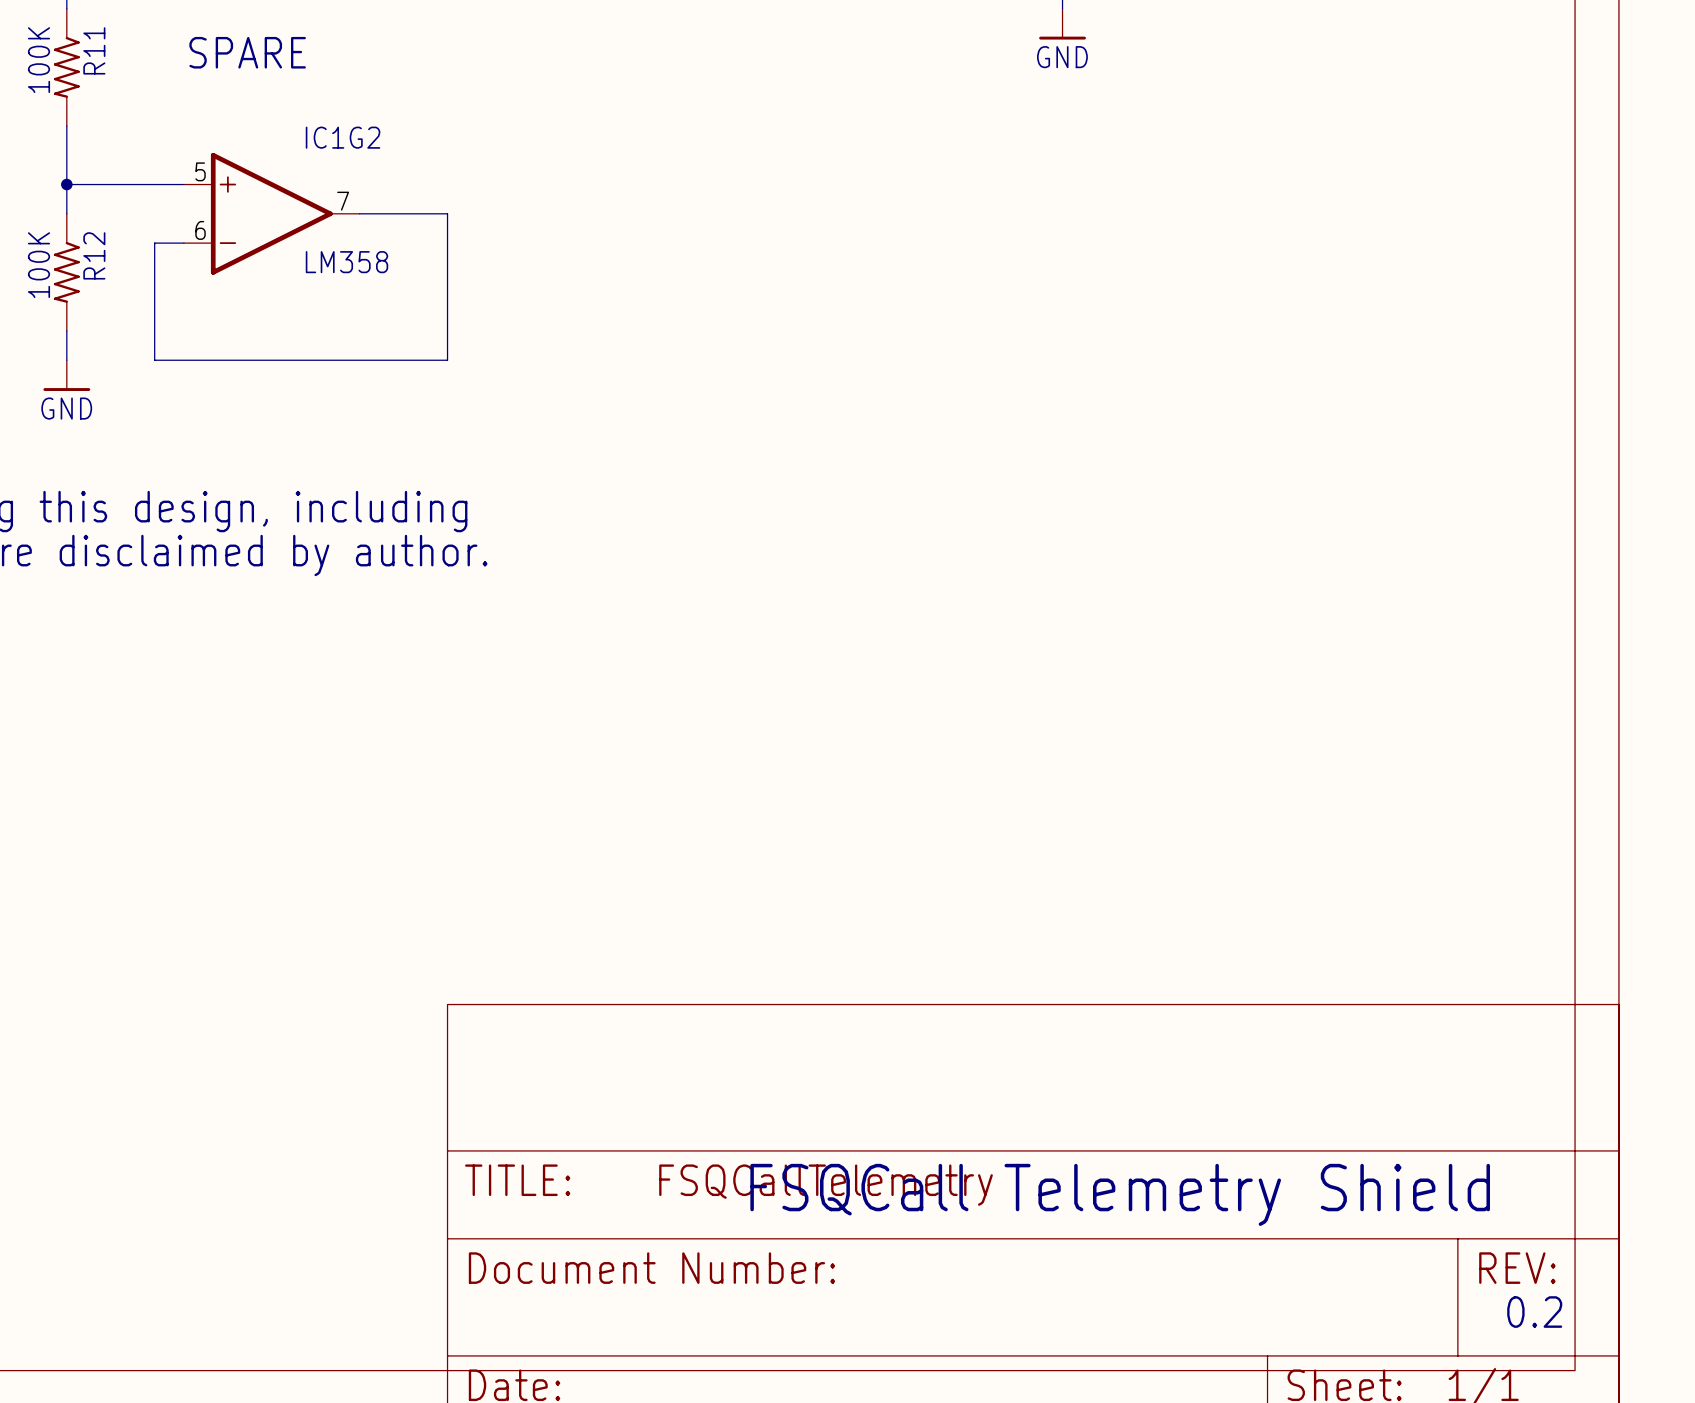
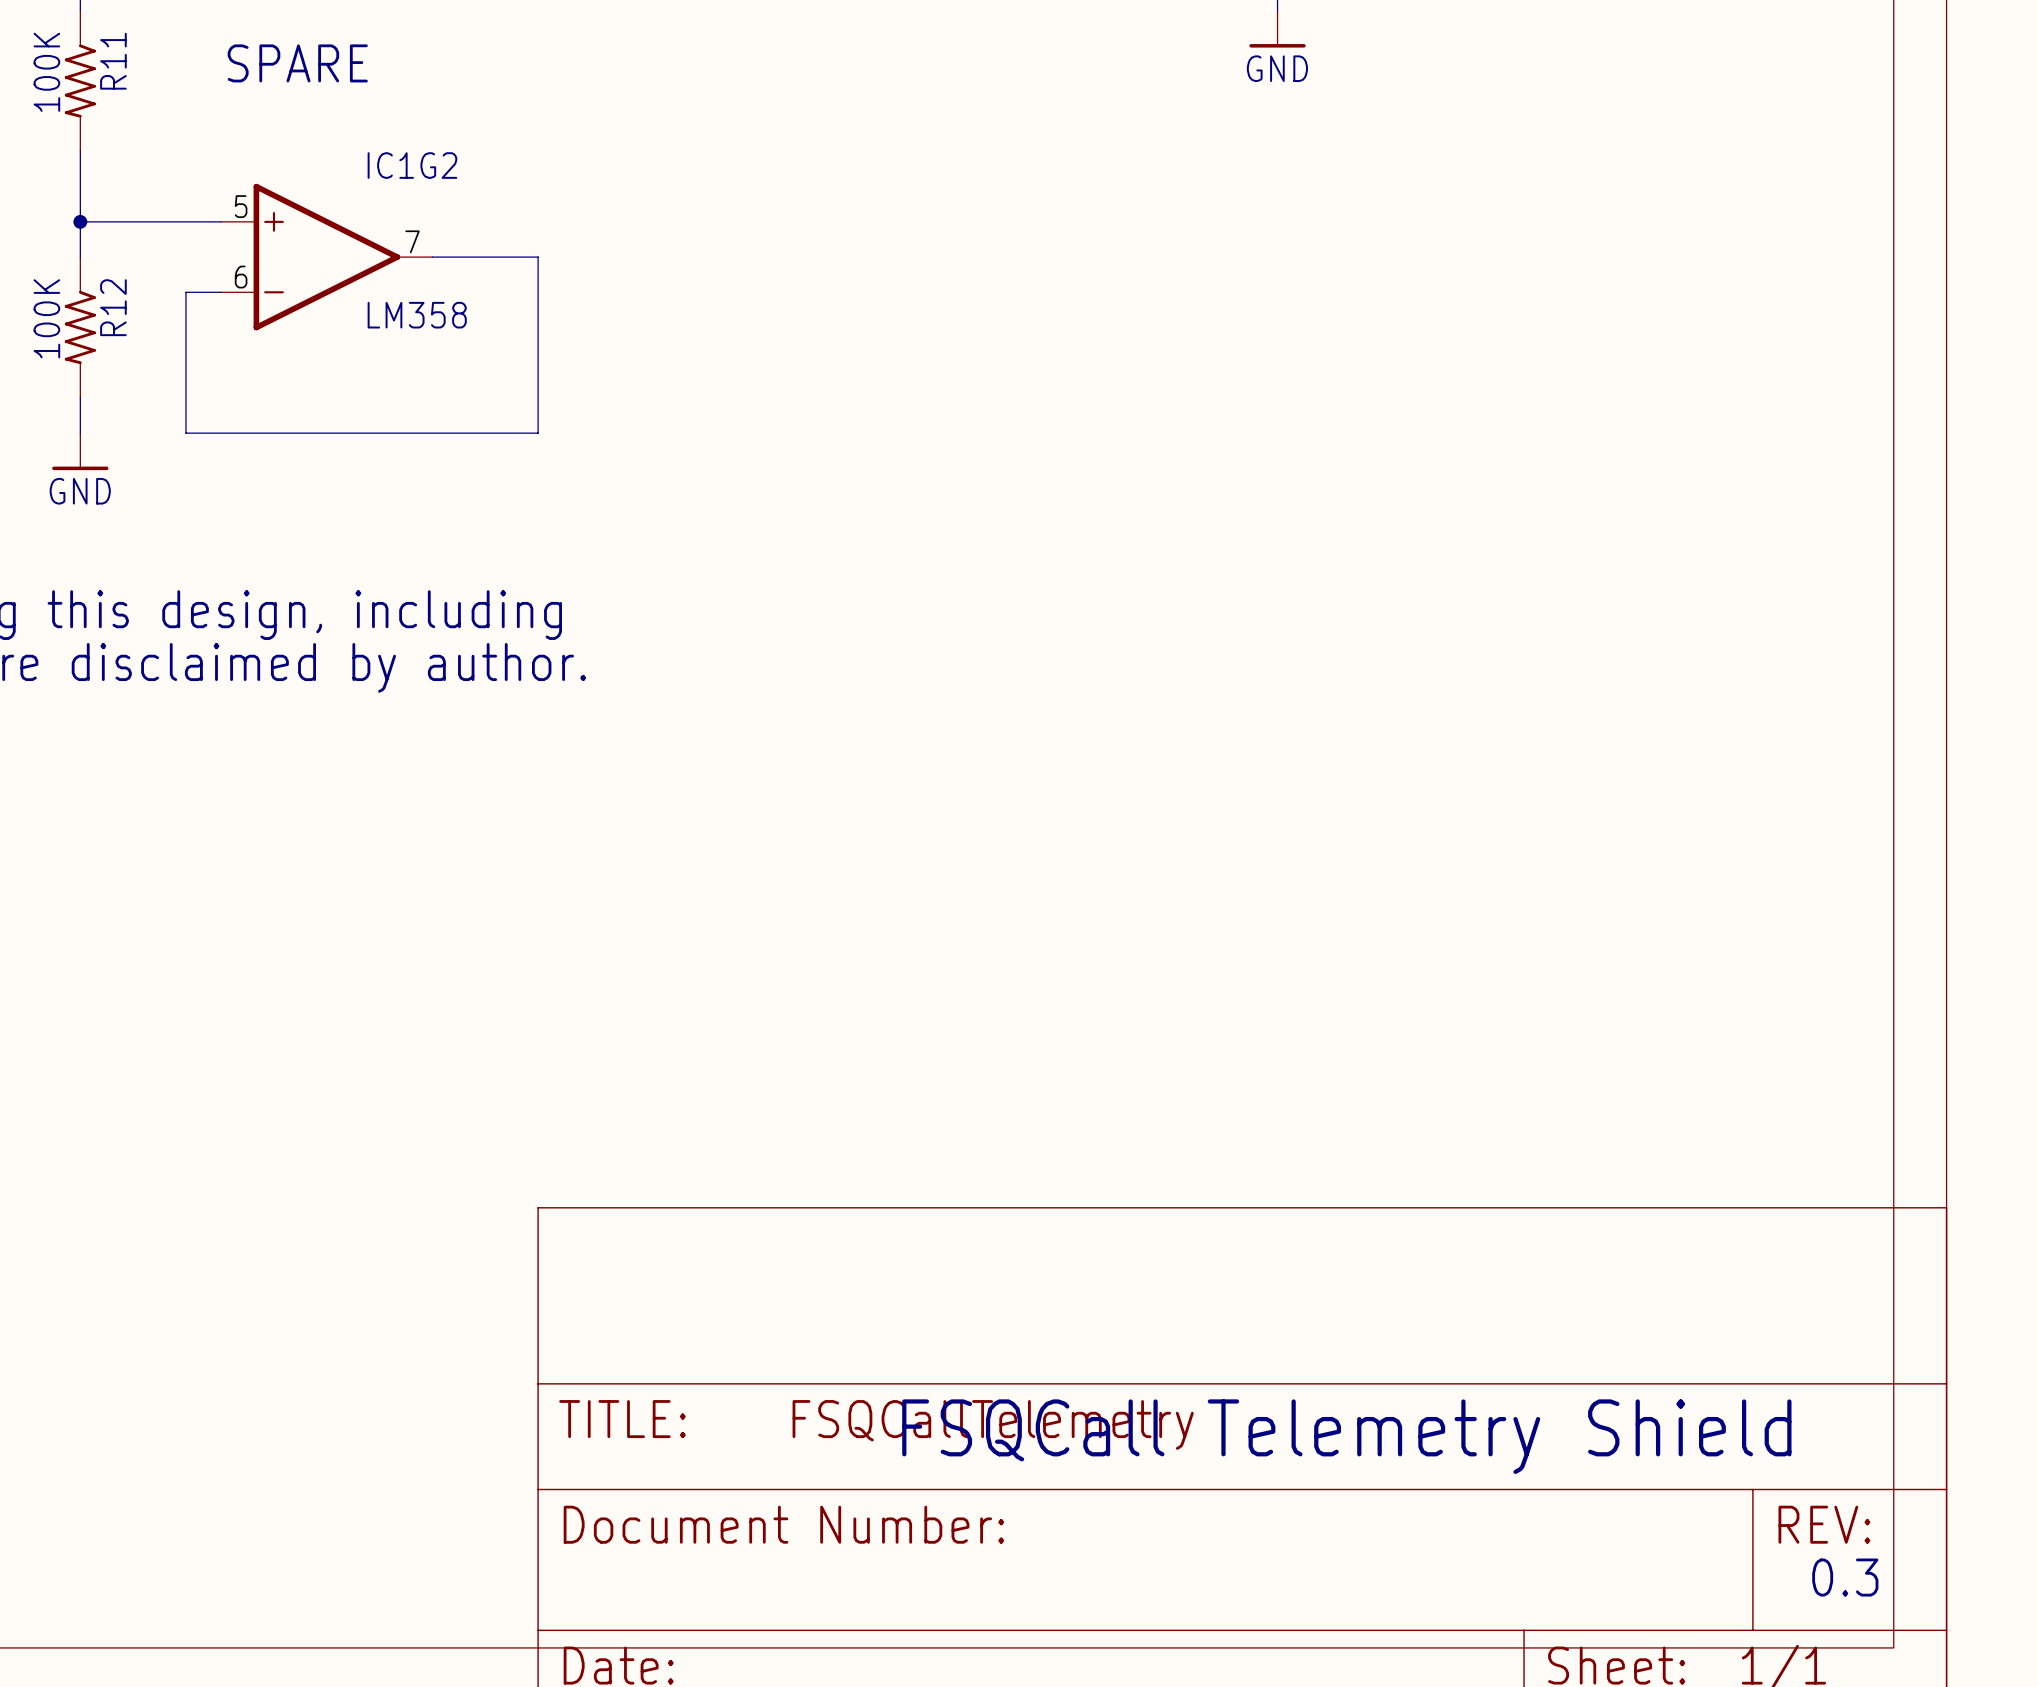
text: 0.2 (1534, 1312) -> 0.3 (1845, 1577)

